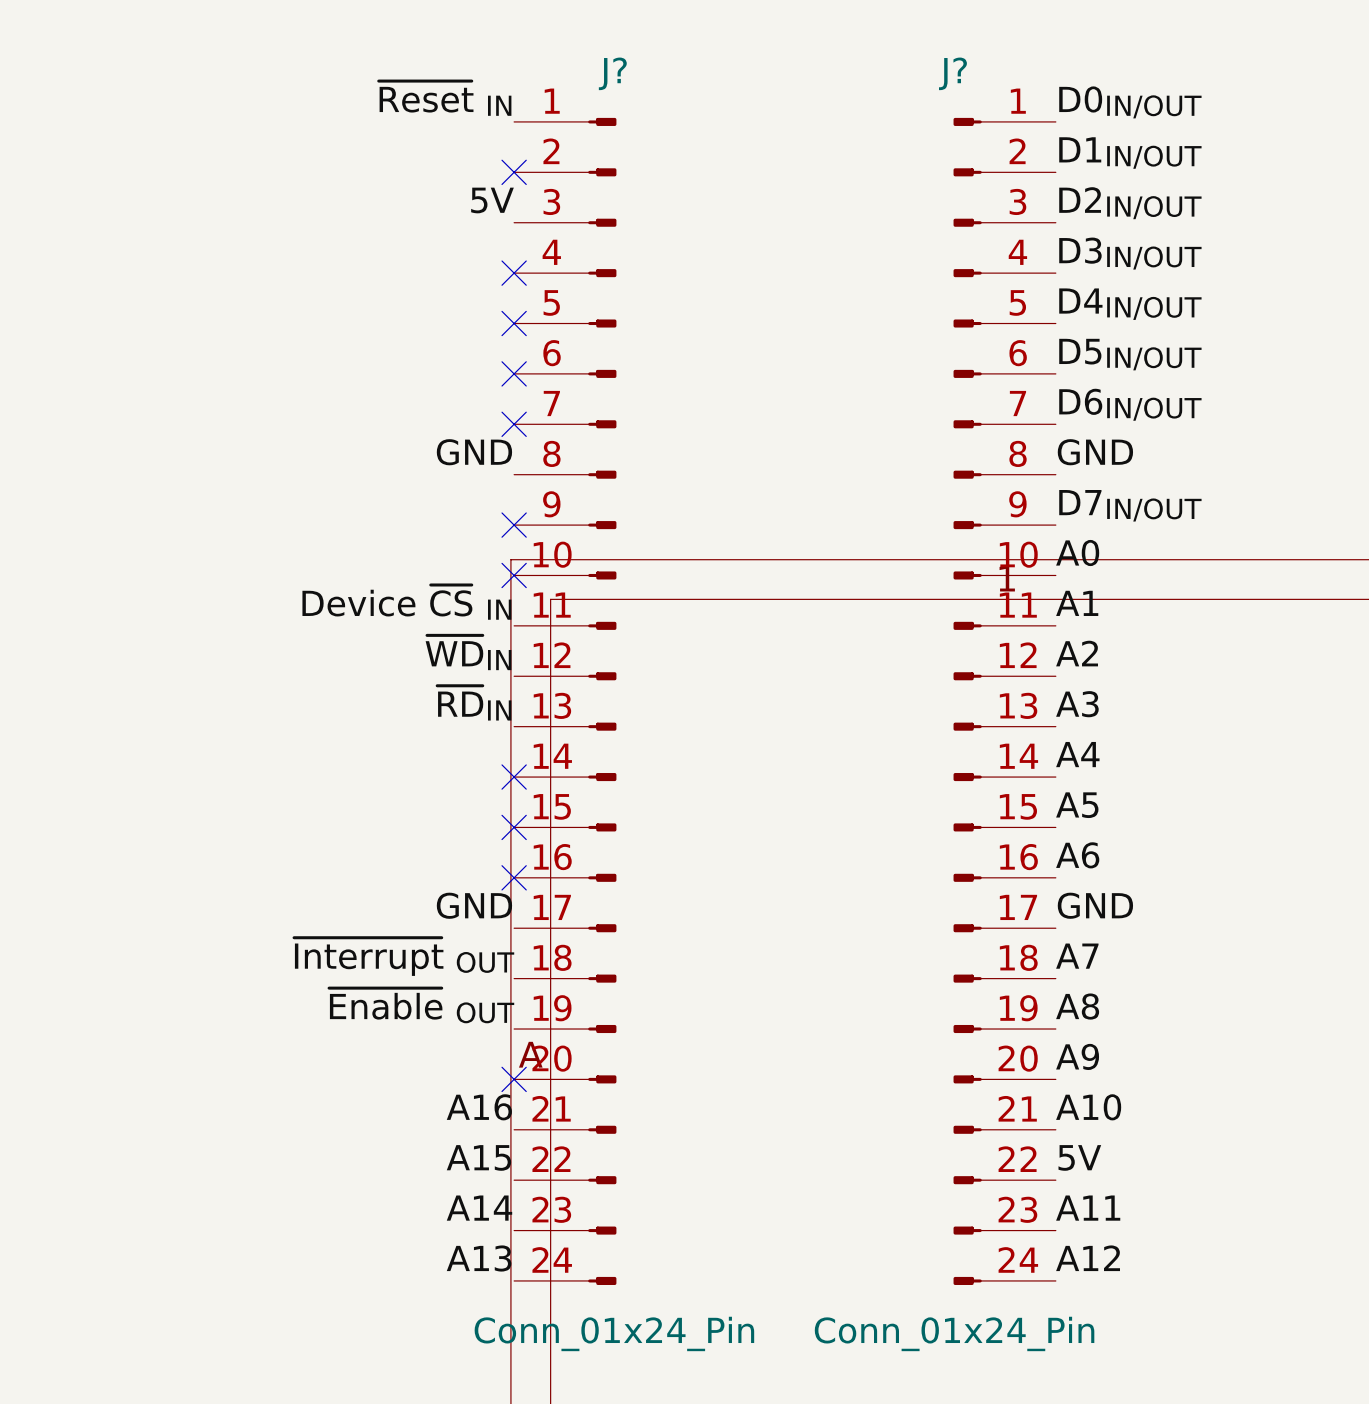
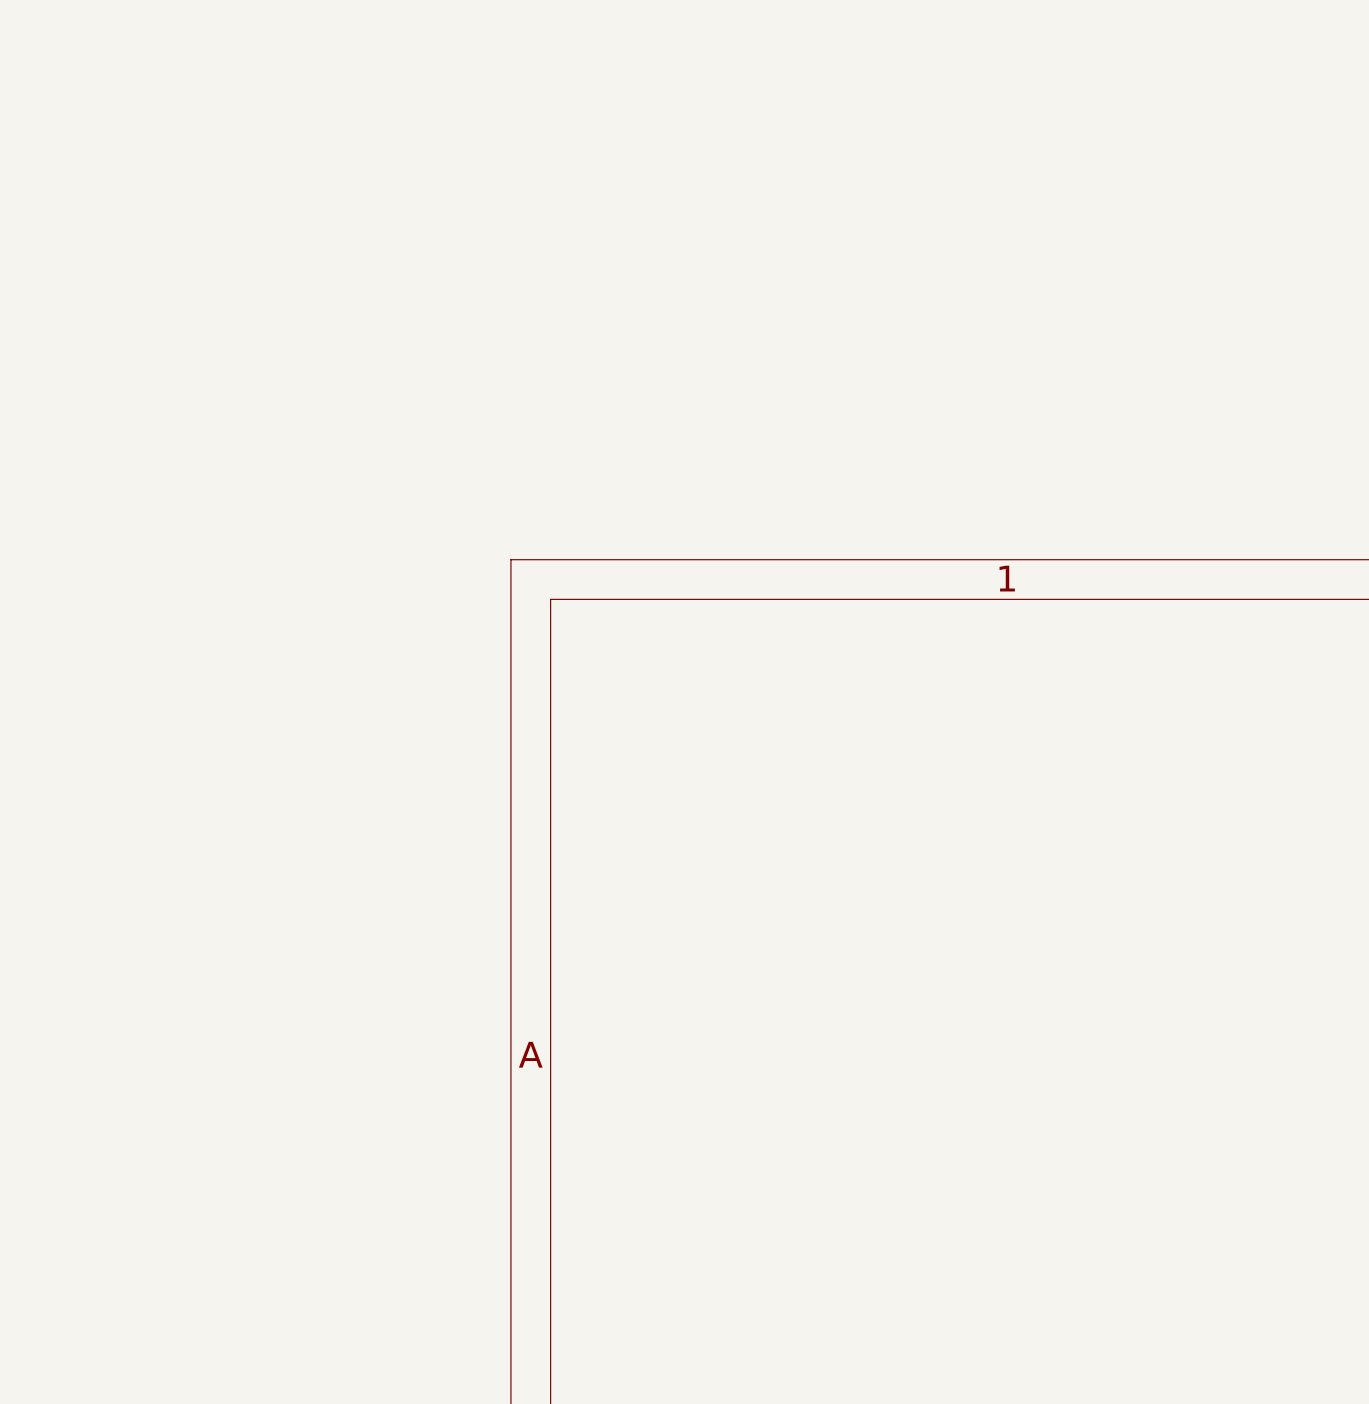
label: ~{Reset} IN (445, 98) -> none
label: D0IN/OUT (1130, 102) -> none
label: D1IN/OUT (1130, 153) -> none
no-connect mark: (514, 172) -> none
label: 5V (492, 200) -> none
label: D2IN/OUT (1130, 203) -> none
label: D3IN/OUT (1130, 253) -> none
no-connect mark: (514, 273) -> none
label: D4IN/OUT (1130, 304) -> none
no-connect mark: (514, 323) -> none
label: D5IN/OUT (1130, 354) -> none
no-connect mark: (514, 373) -> none
label: D6IN/OUT (1130, 404) -> none
no-connect mark: (514, 424) -> none
label: GND (474, 452) -> none
label: GND (1095, 452) -> none
label: D7IN/OUT (1130, 505) -> none
no-connect mark: (514, 525) -> none
label: A0 (1077, 553) -> none
no-connect mark: (514, 575) -> none
label: Device ~{CS} IN (406, 602) -> none
label: A1 (1077, 603) -> none
label: ~{WD}IN (468, 652) -> none
label: A2 (1077, 653) -> none
J?: Conn_01x24_Pin (565, 701) -> none
J?: Conn_01x24_Pin (1004, 701) -> none
label: ~{RD}IN (474, 703) -> none
label: A3 (1077, 704) -> none
label: A4 (1077, 754) -> none
no-connect mark: (514, 777) -> none
label: A5 (1077, 805) -> none
no-connect mark: (514, 827) -> none
label: A6 (1077, 855) -> none
no-connect mark: (514, 877) -> none
label: GND (474, 905) -> none
label: GND (1095, 905) -> none
label: ~{Interrupt} OUT (404, 956) -> none
label: A7 (1077, 956) -> none
label: ~{Enable} OUT (421, 1005) -> none
label: A8 (1077, 1006) -> none
label: A9 (1077, 1056) -> none
no-connect mark: (514, 1079) -> none
label: A16 (479, 1107) -> none
label: A10 (1088, 1107) -> none
label: A15 (478, 1157) -> none
label: 5V (1079, 1157) -> none
label: A14 (479, 1208) -> none
label: A11 (1088, 1208) -> none
label: A13 (479, 1258) -> none
label: A12 (1088, 1258) -> none

